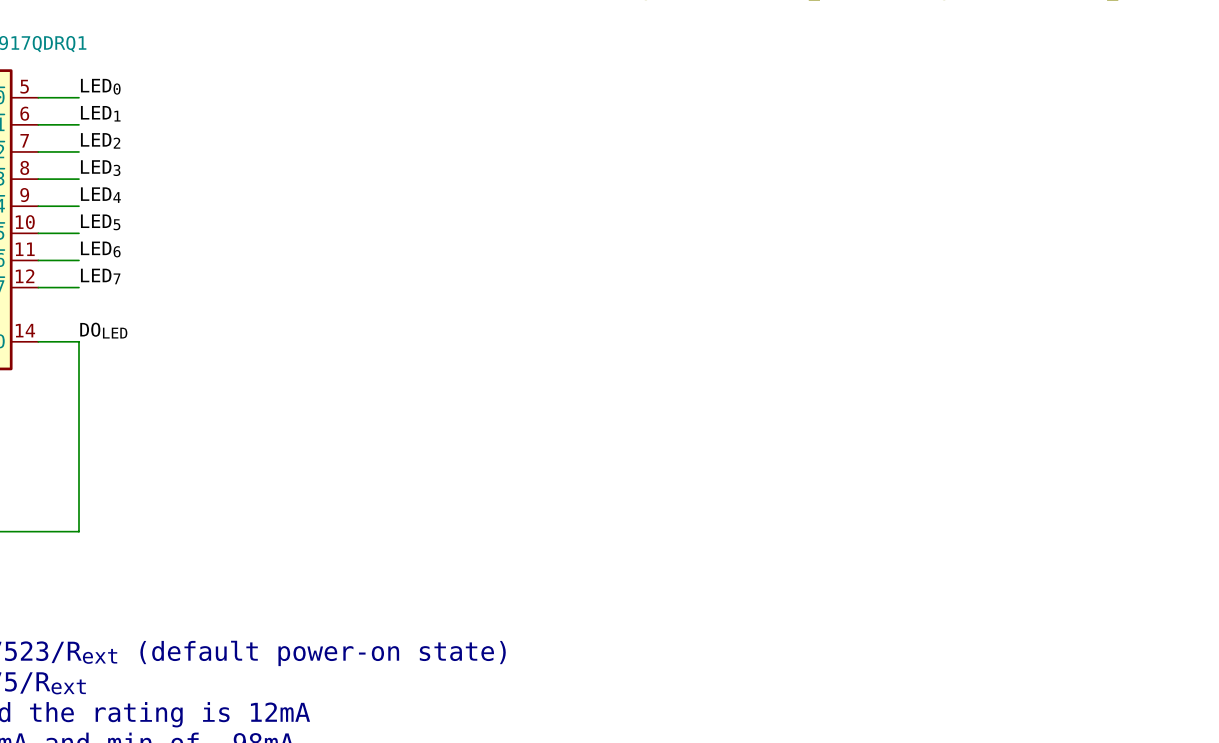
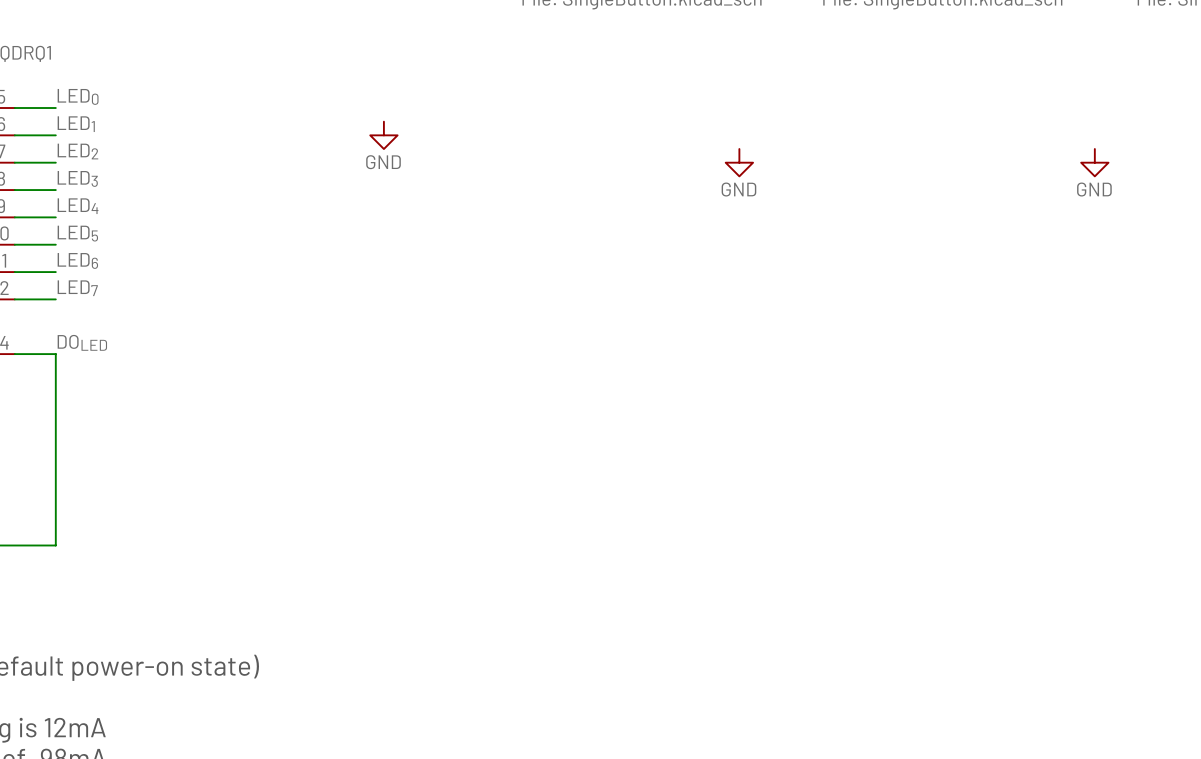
power symbol: none -> GND (383, 135)
power symbol: none -> GND (739, 162)
power symbol: none -> GND (1094, 162)

